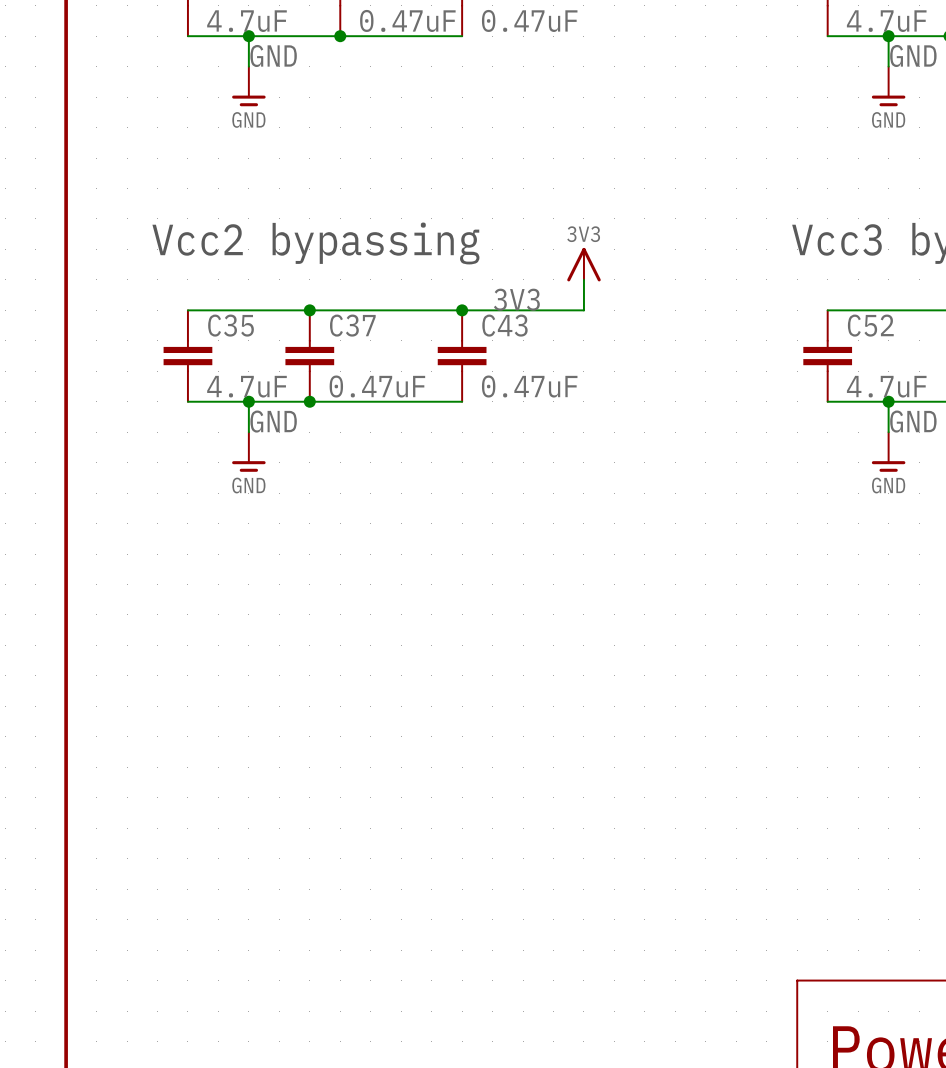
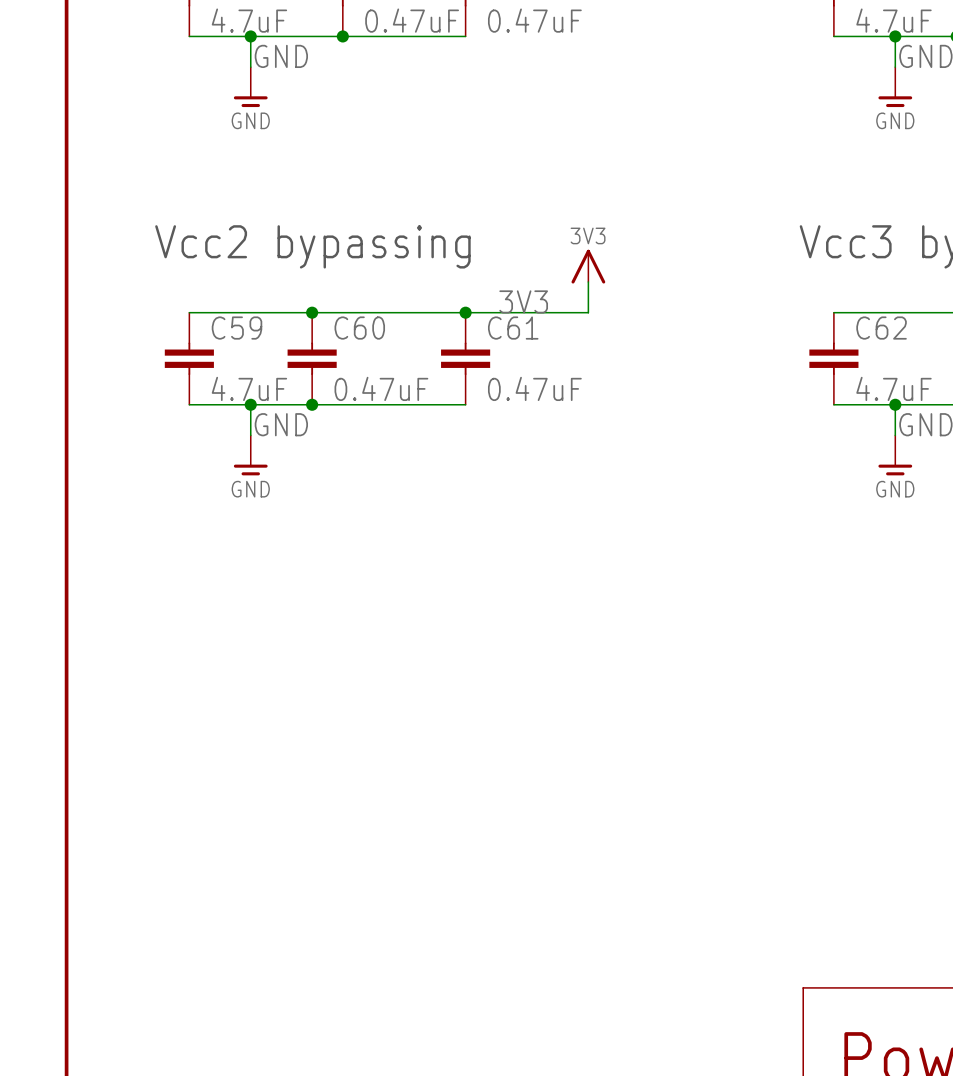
C35 name: C35 (231, 325) -> C59 (236, 328)
C37 name: C37 (352, 325) -> C60 (359, 328)
C43 name: C43 (504, 325) -> C61 (513, 328)
C52 name: C52 (870, 325) -> C62 (881, 328)

